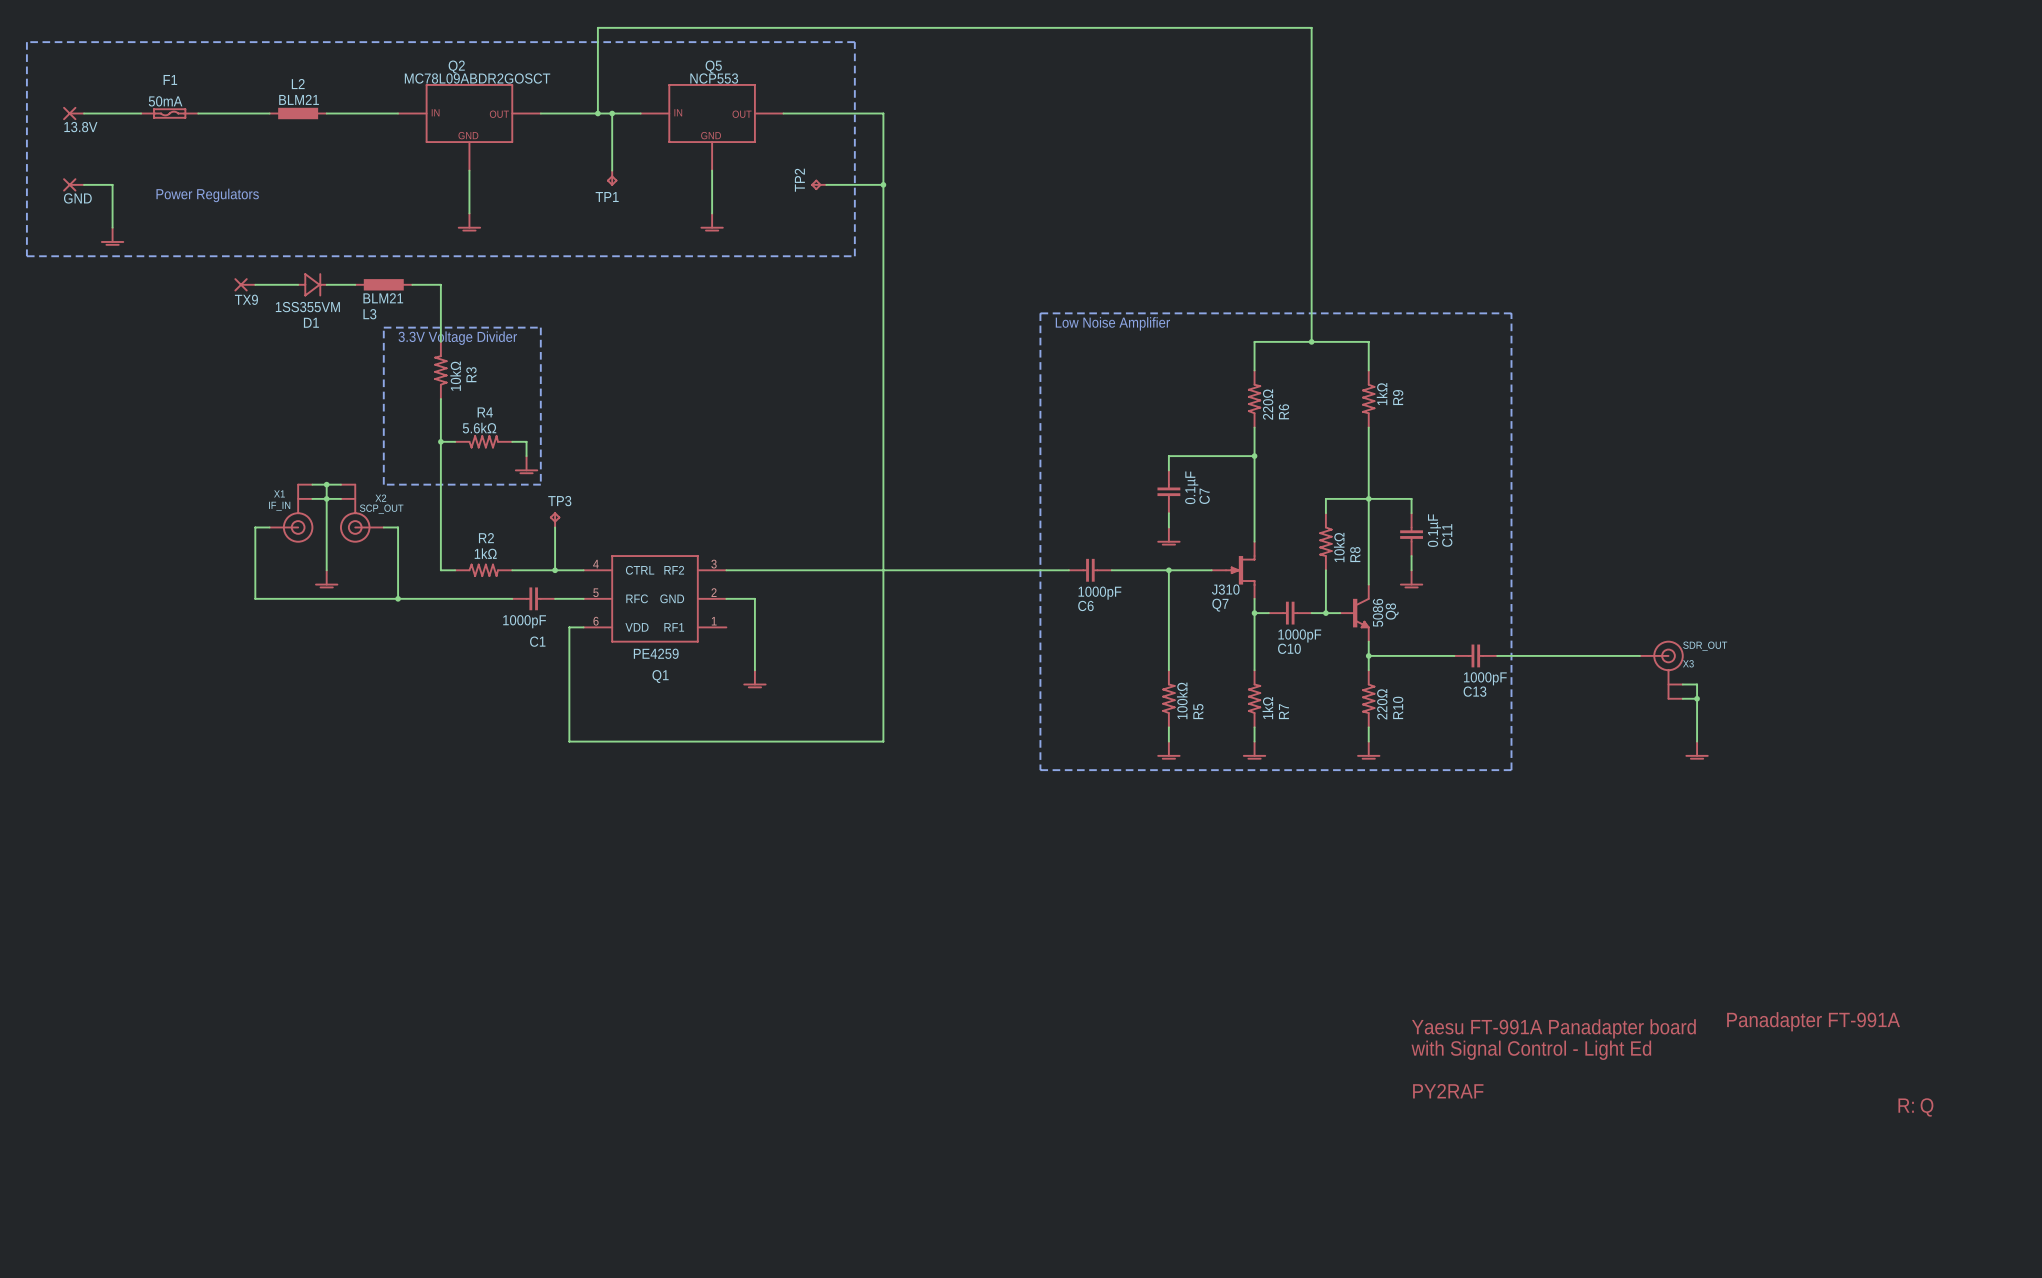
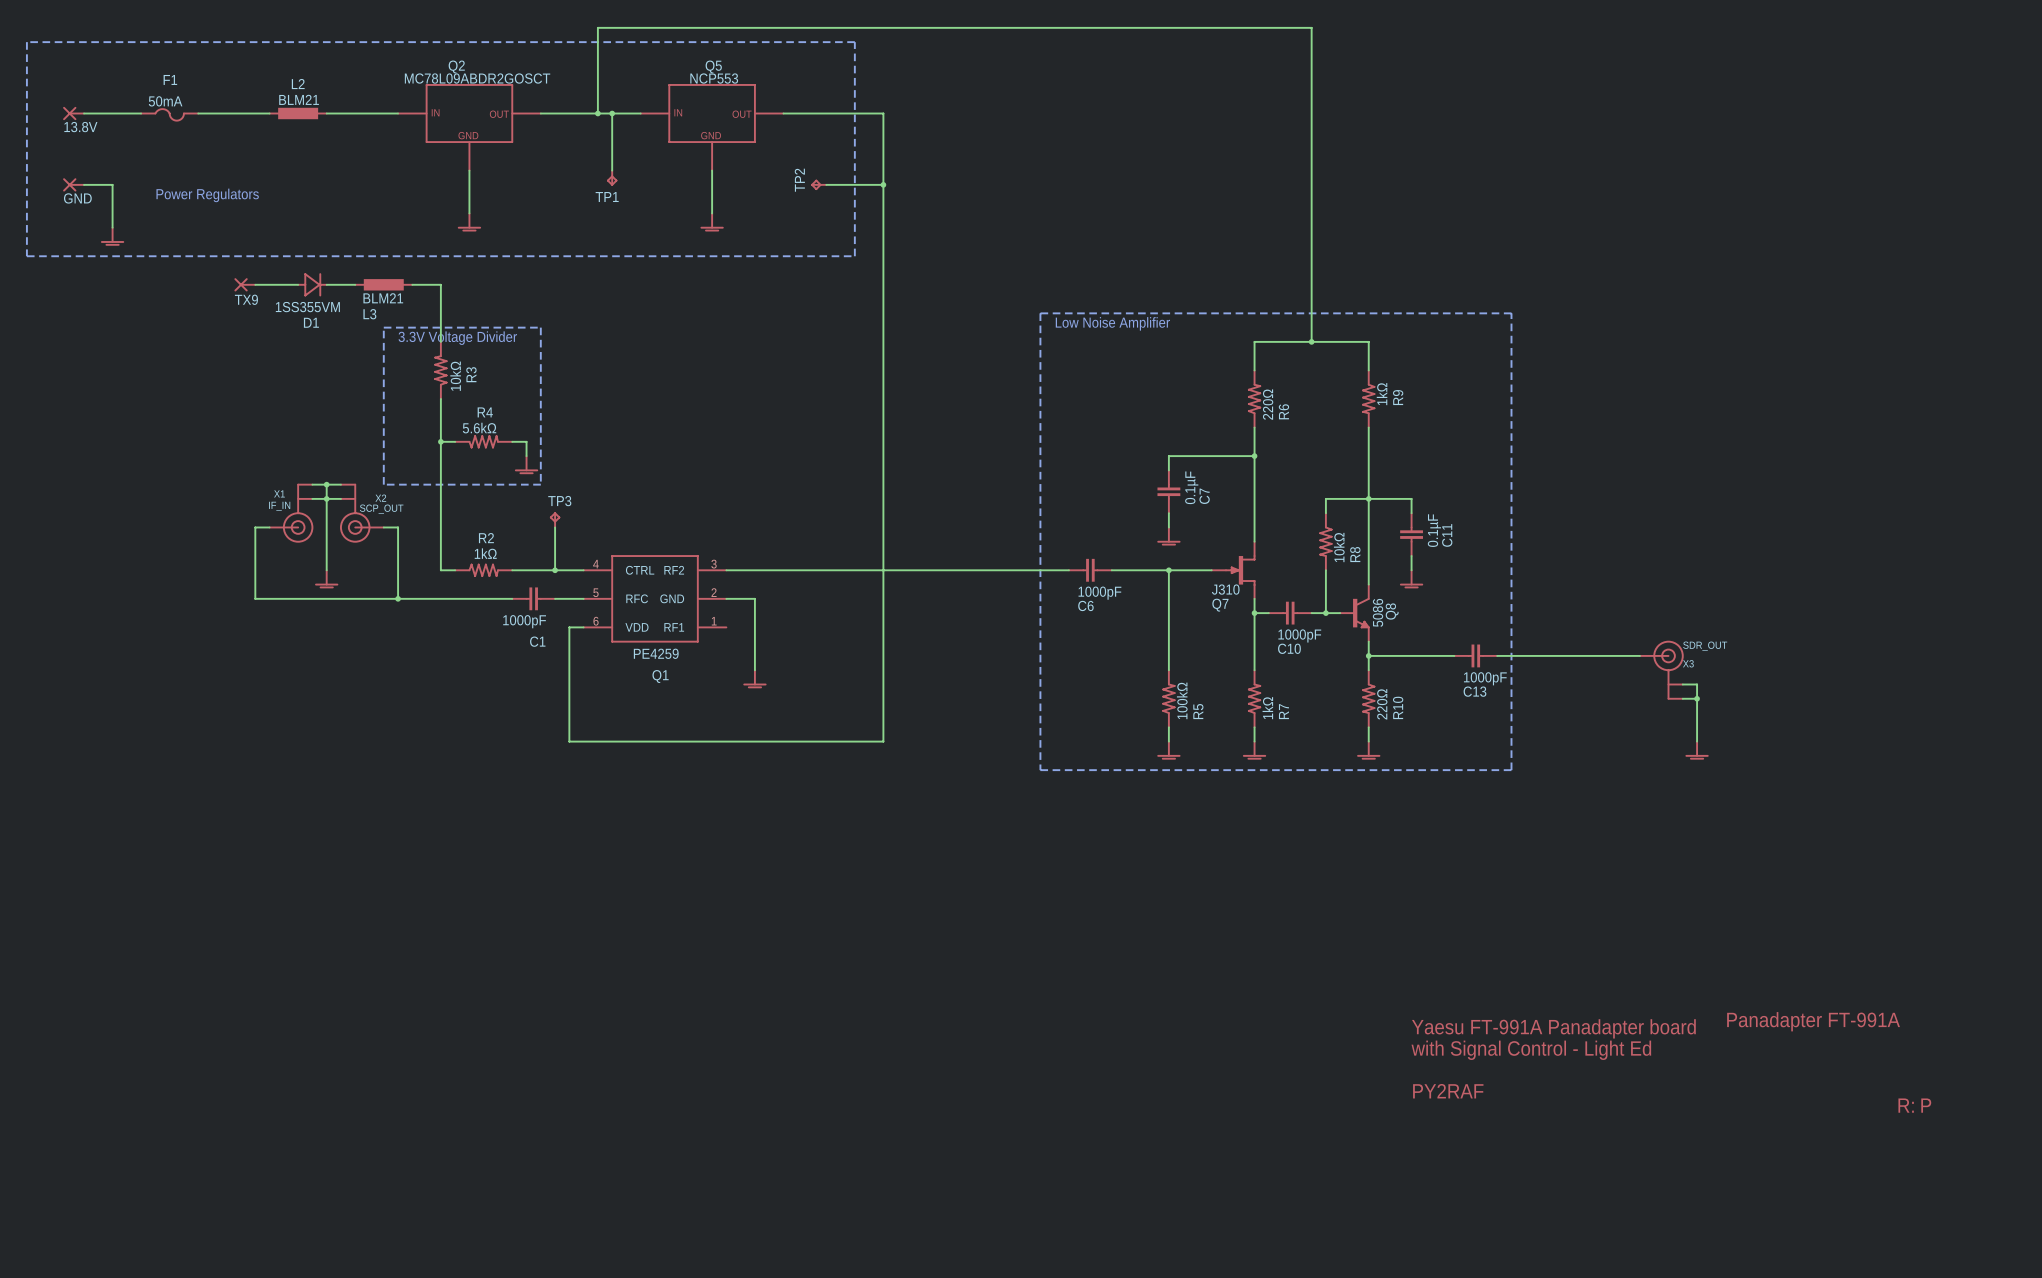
F1 symbol: [141, 108, 199, 119] -> [141, 108, 199, 122]
text: Q (1927, 1107) -> P (1926, 1105)

